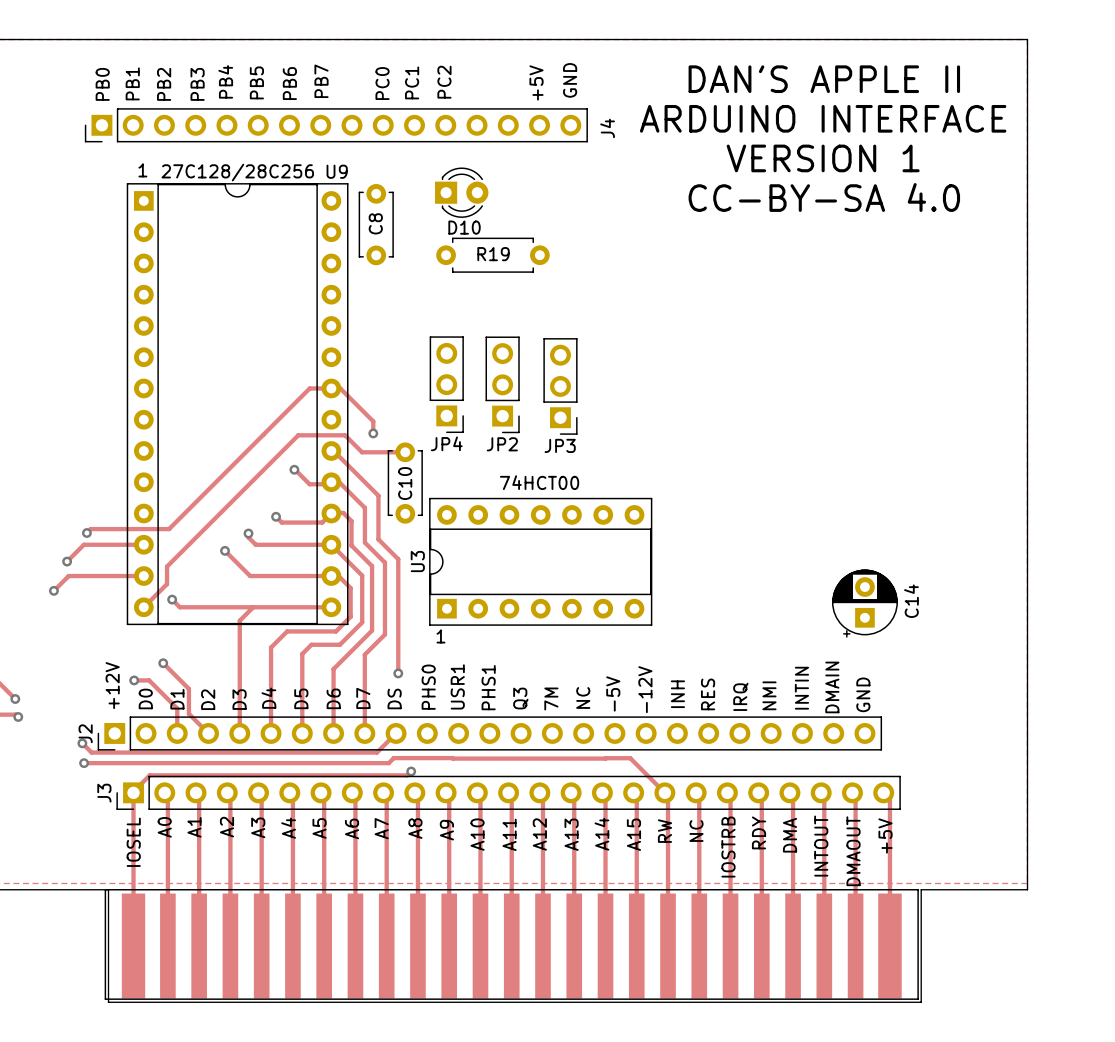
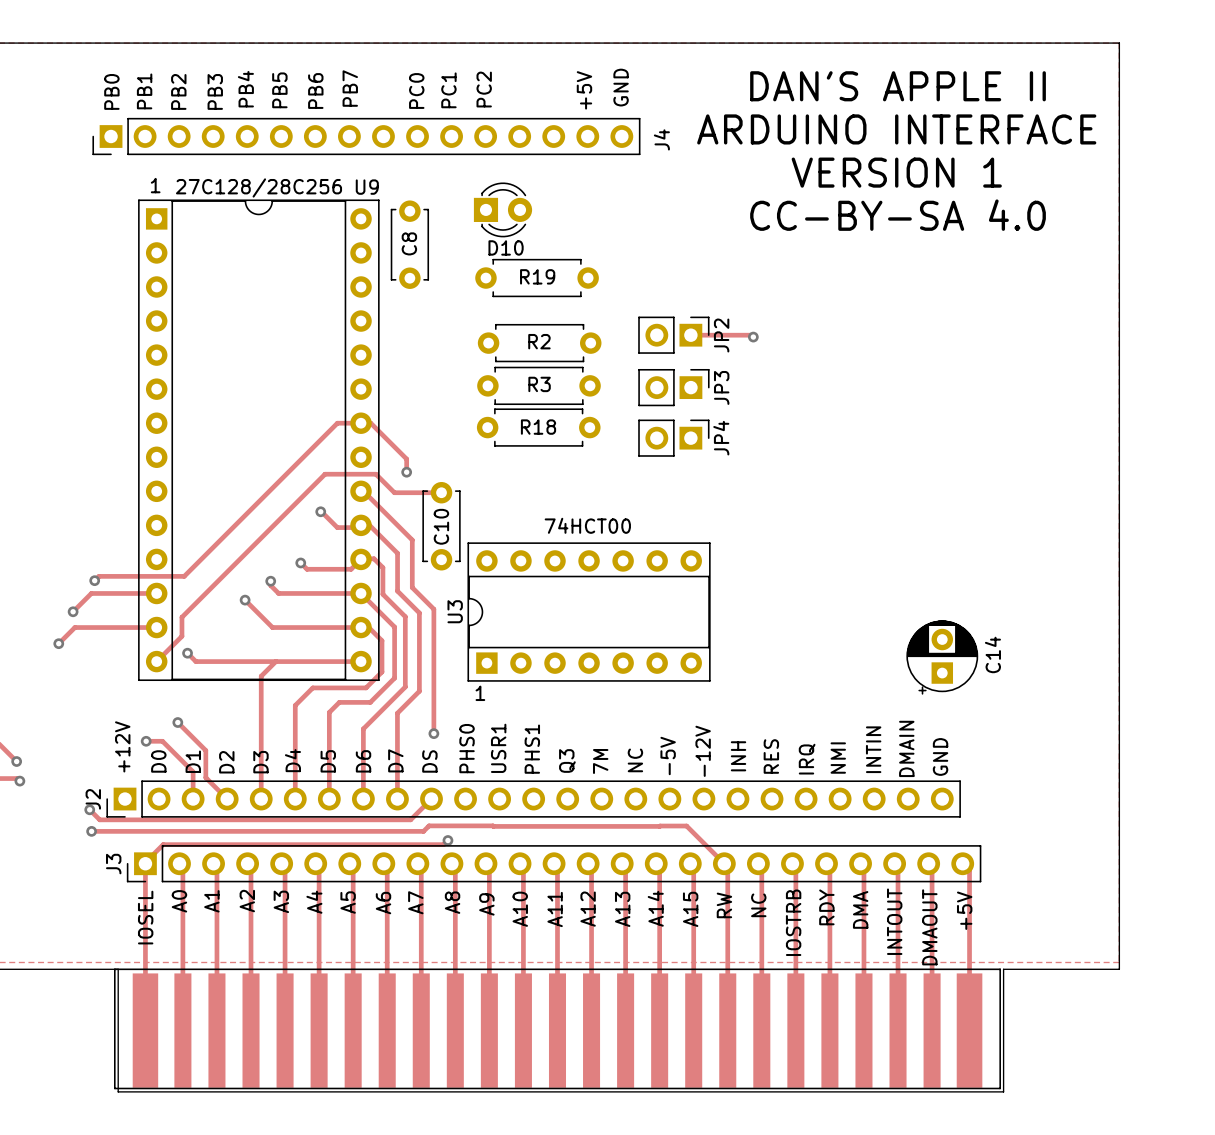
track: none -> (690, 335) (751, 335) (753, 337)
via: none -> (753, 337)
R2: none -> (539, 343)
JP4 footprint: [429, 336, 464, 434] -> [638, 419, 710, 457]
JP2 footprint: [485, 336, 520, 434] -> [638, 316, 710, 354]
JP3 footprint: [543, 338, 578, 435] -> [638, 368, 710, 407]
R3: none -> (538, 385)
R18: none -> (538, 427)
JP4 name position: JP4 (446, 443) -> JP4 (721, 438)
JP2 name position: JP2 (502, 444) -> JP2 (721, 335)
JP3 name position: JP3 (560, 445) -> JP3 (721, 387)

